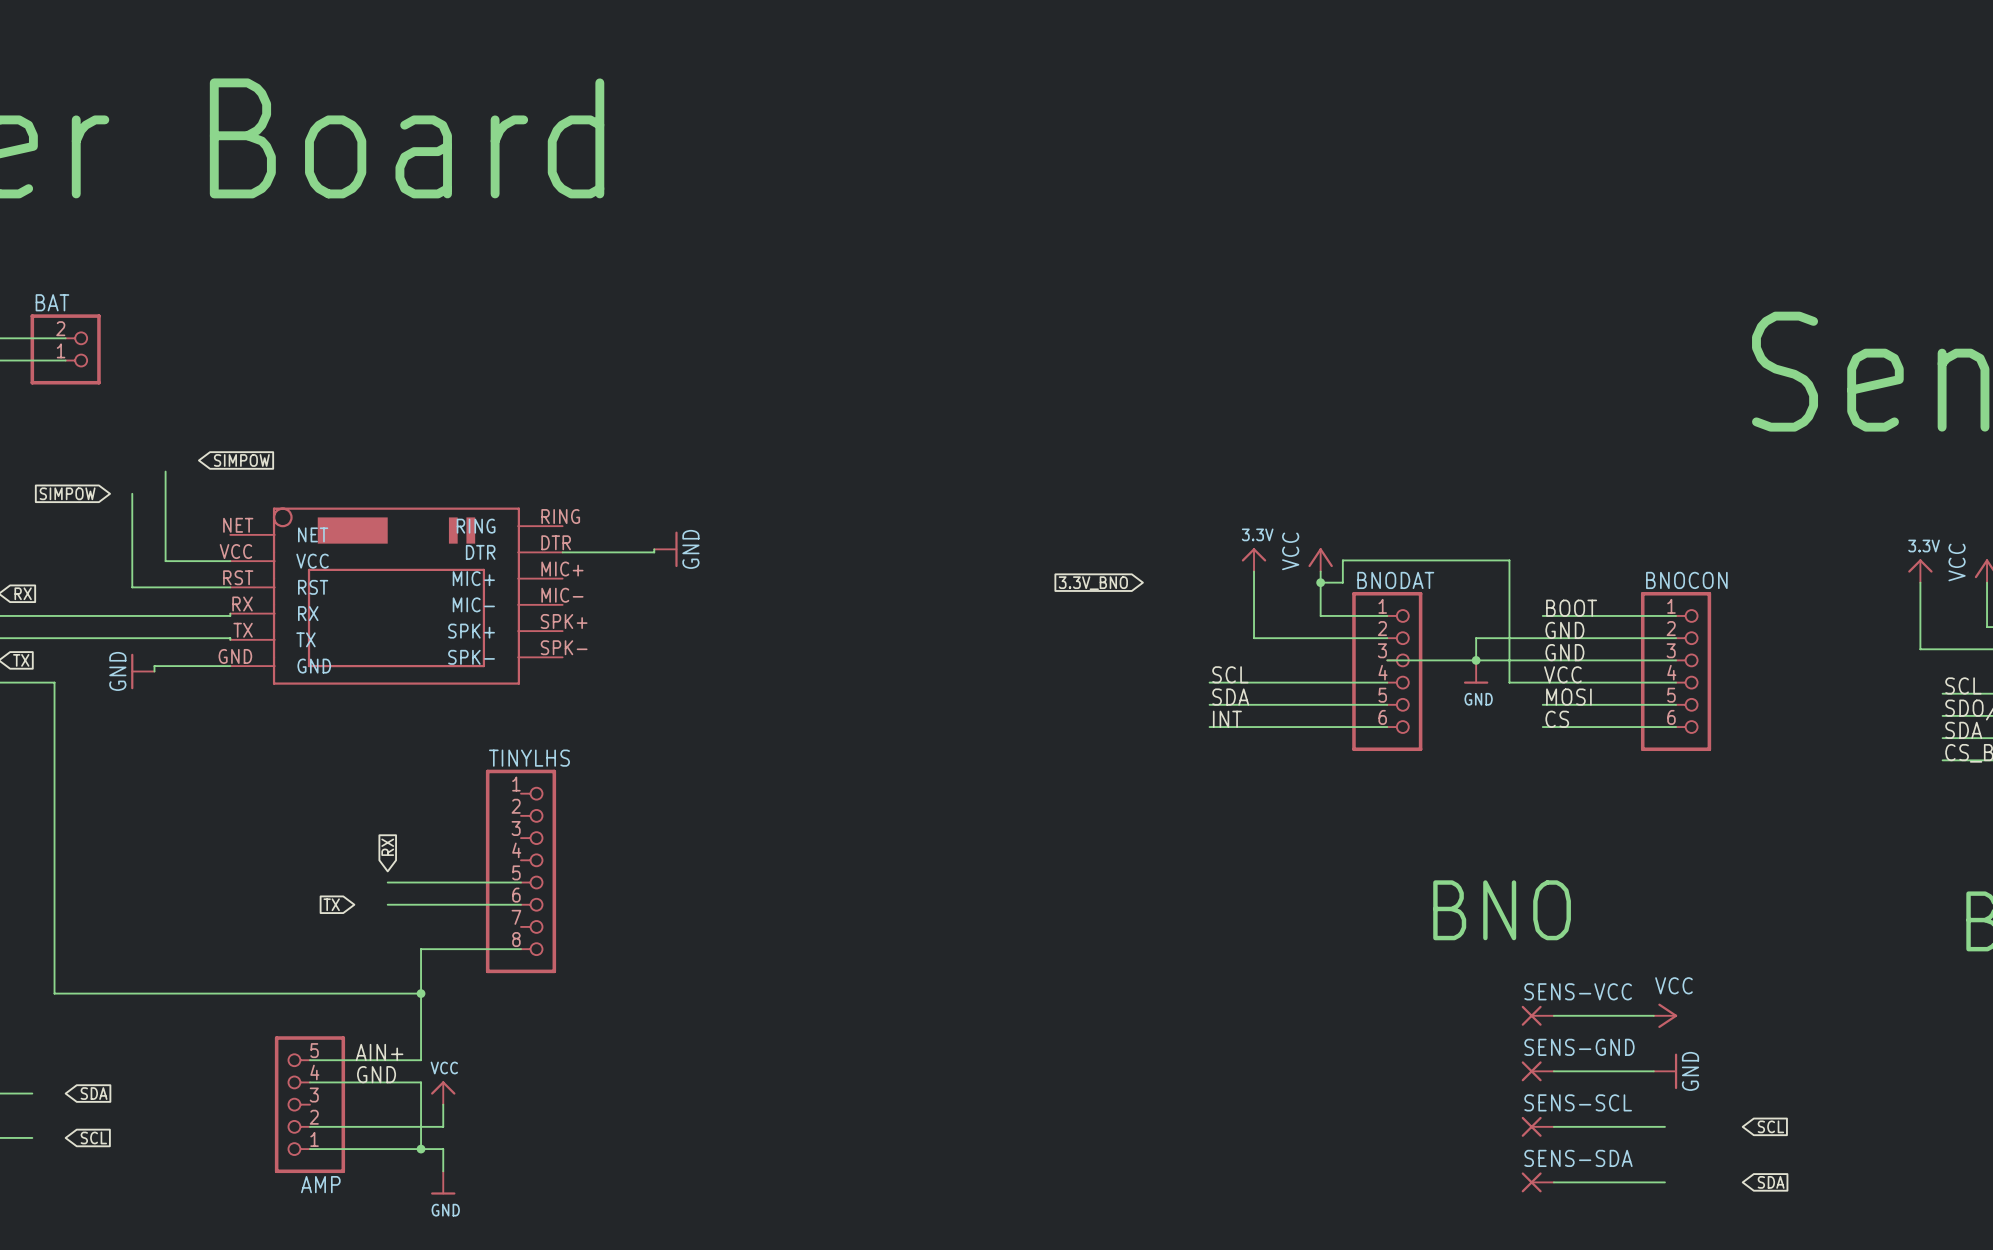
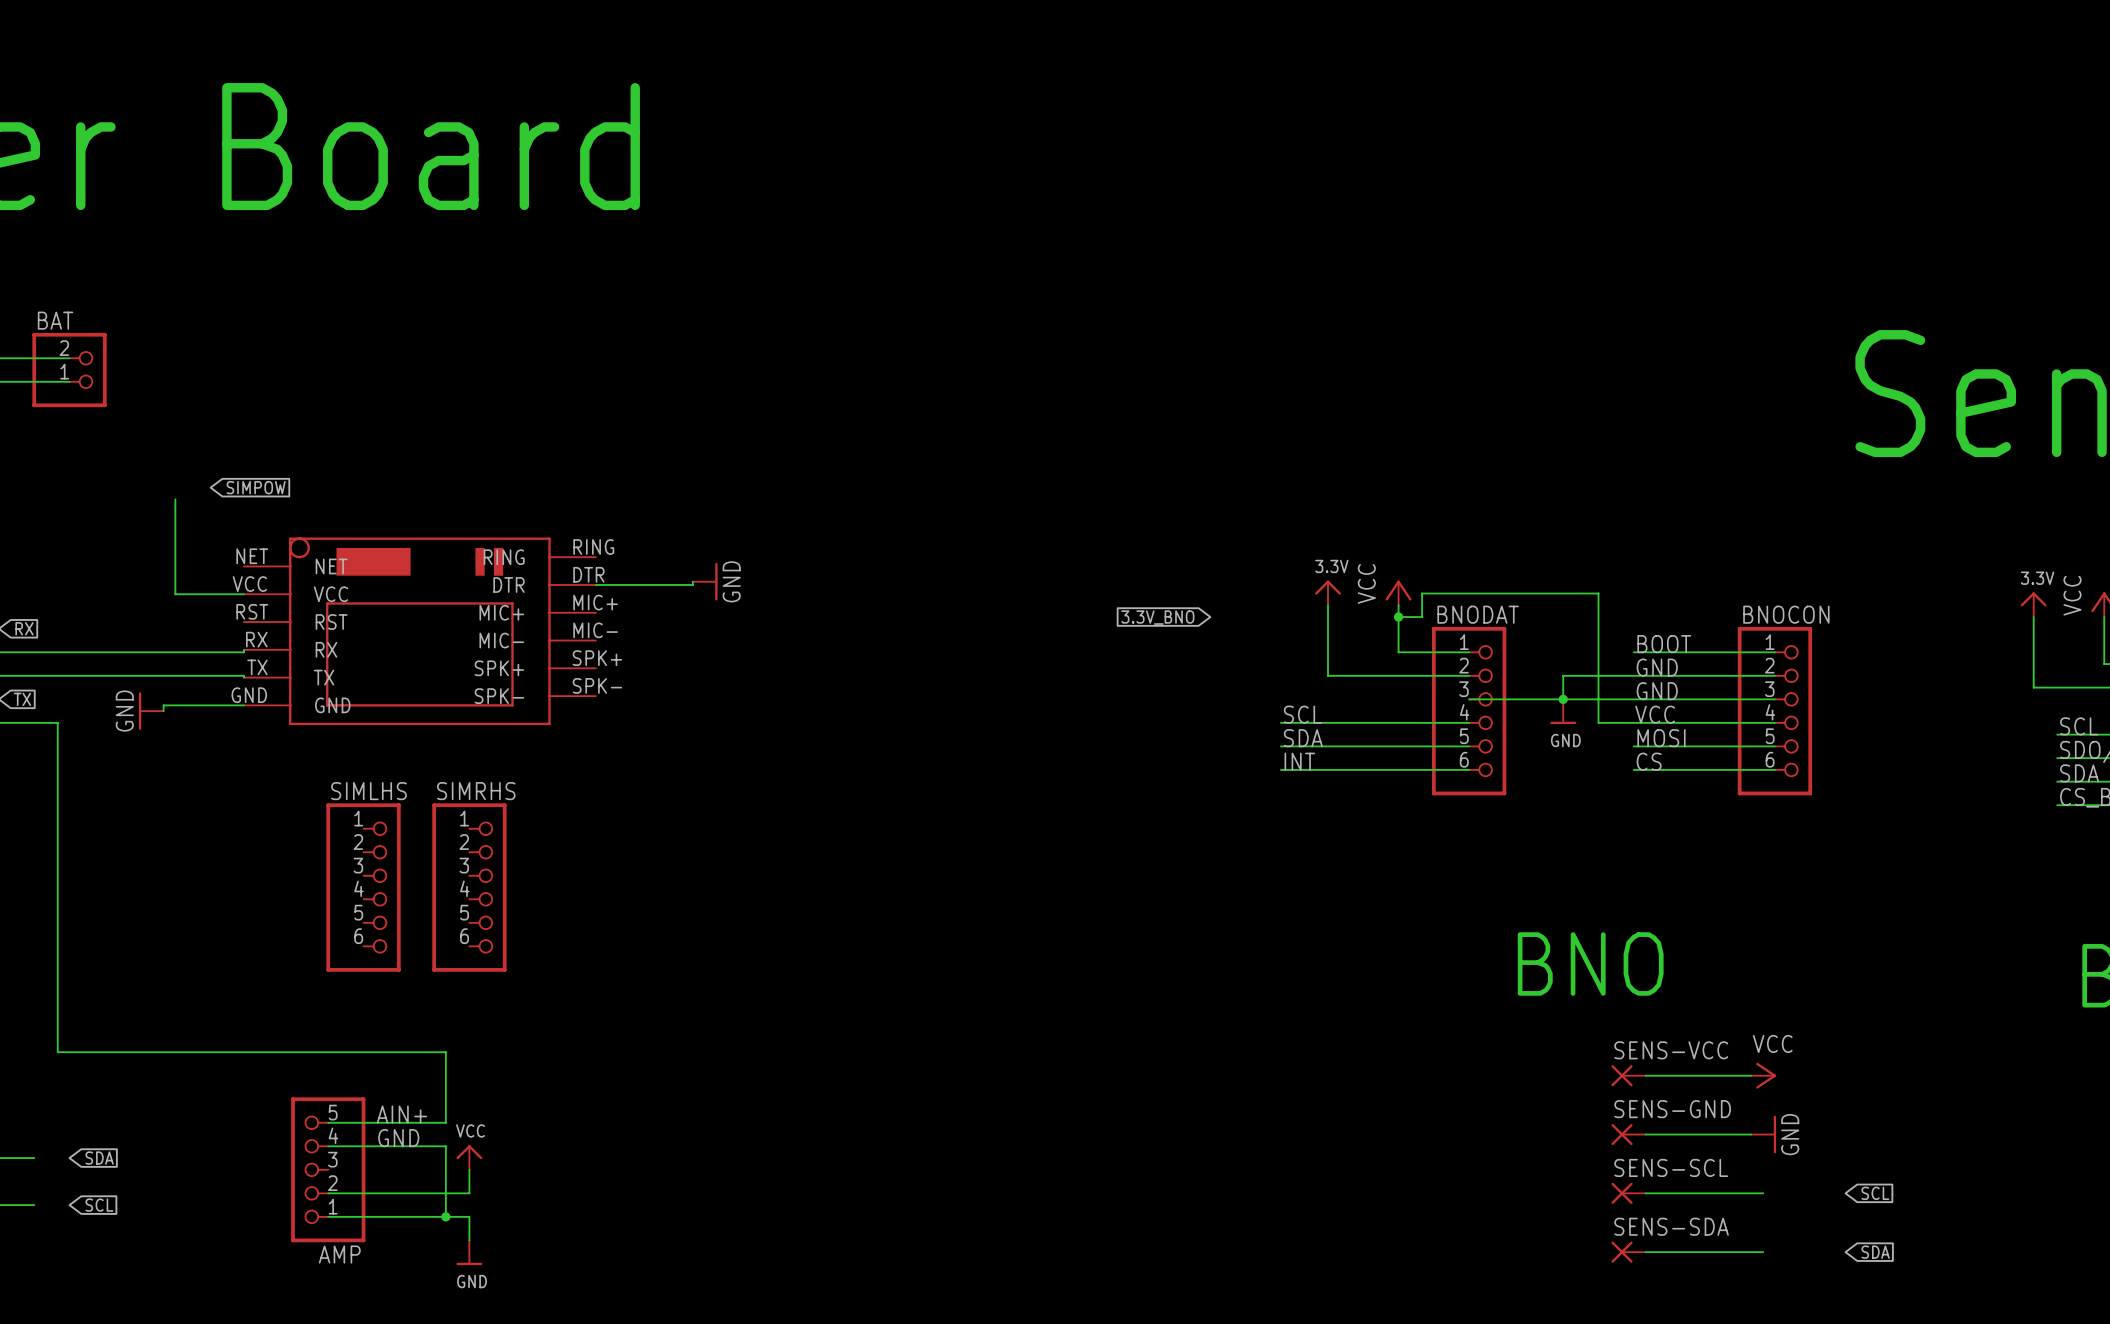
global label: SIMPOW (67, 493) -> none
wire: (132, 493) (132, 587) (230, 587) -> none
SIMLHS: none -> (363, 887)
SIMRHS: none -> (469, 887)
global label: RX (387, 847) -> none
TINYLHS: (520, 871) -> none
wire: (387, 882) (520, 882) -> none
global label: TX (331, 904) -> none
wire: (387, 904) (520, 904) -> none
wire: (520, 949) (421, 949) (421, 993) -> none
junction: (421, 993) -> none

